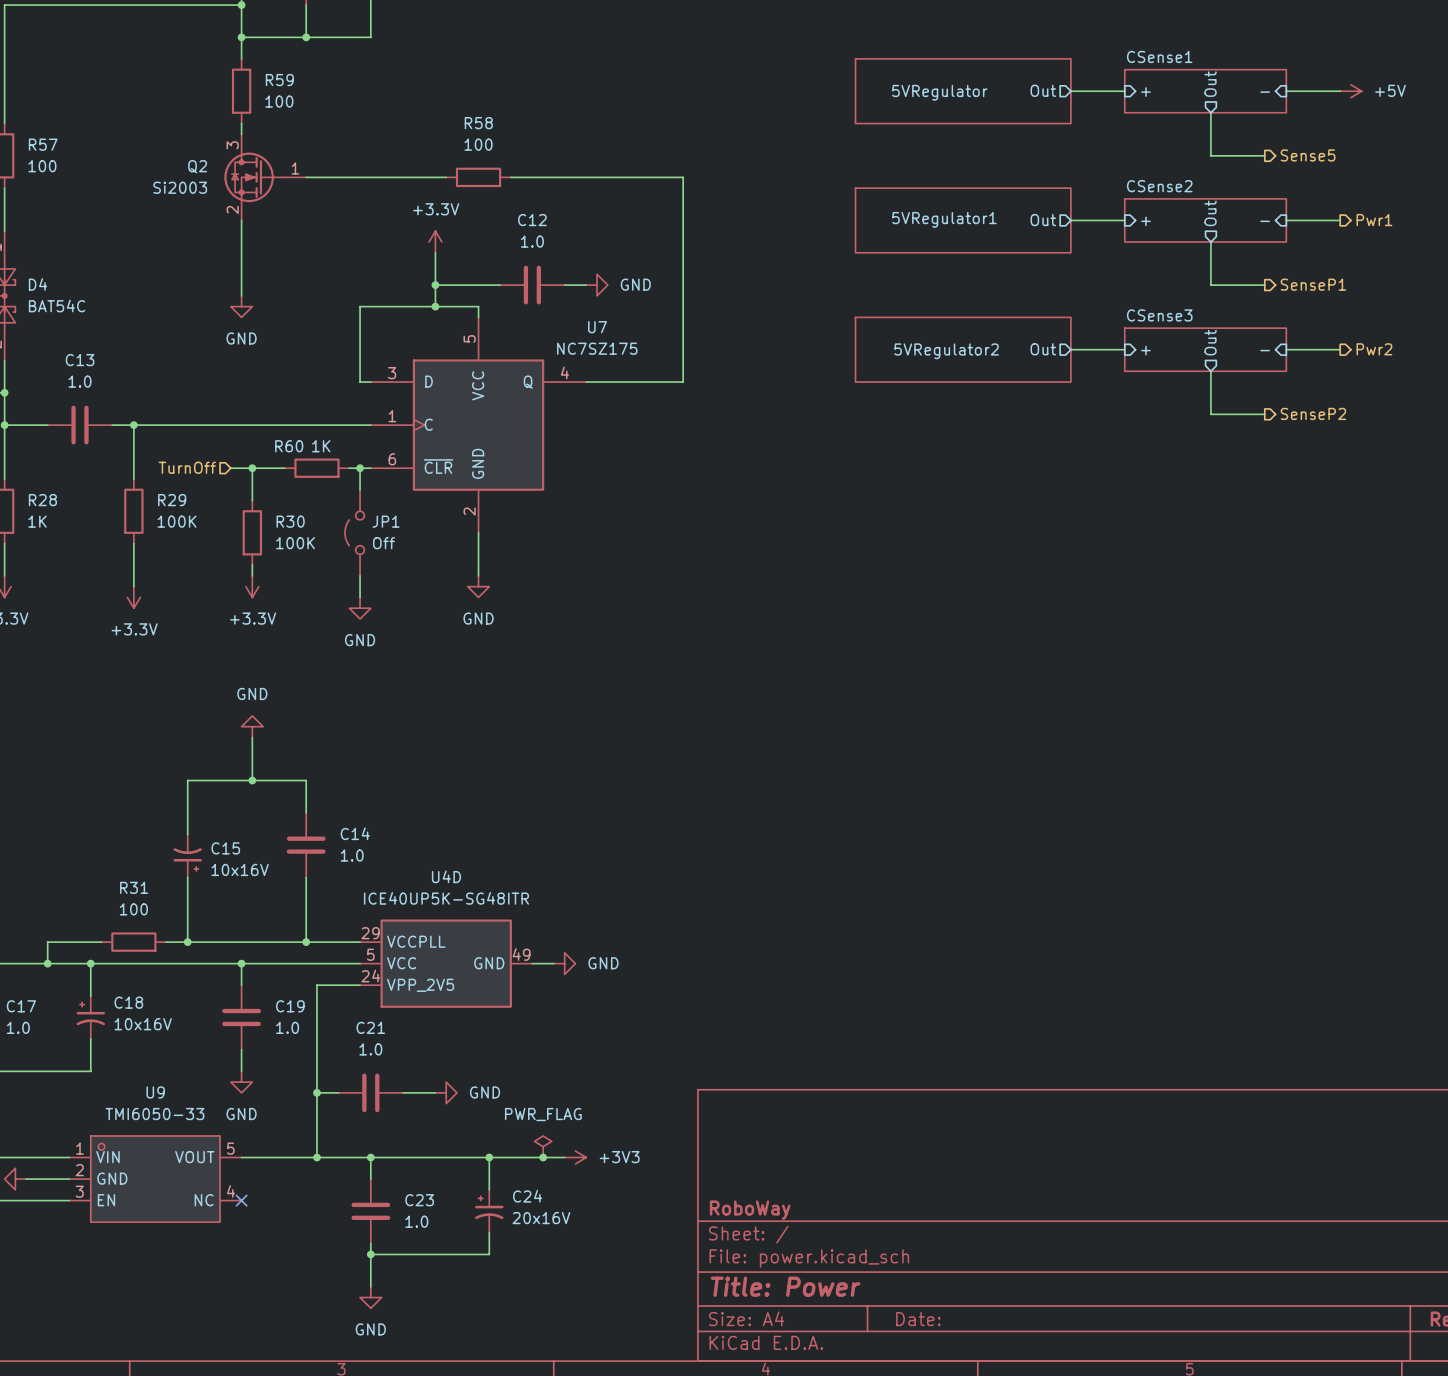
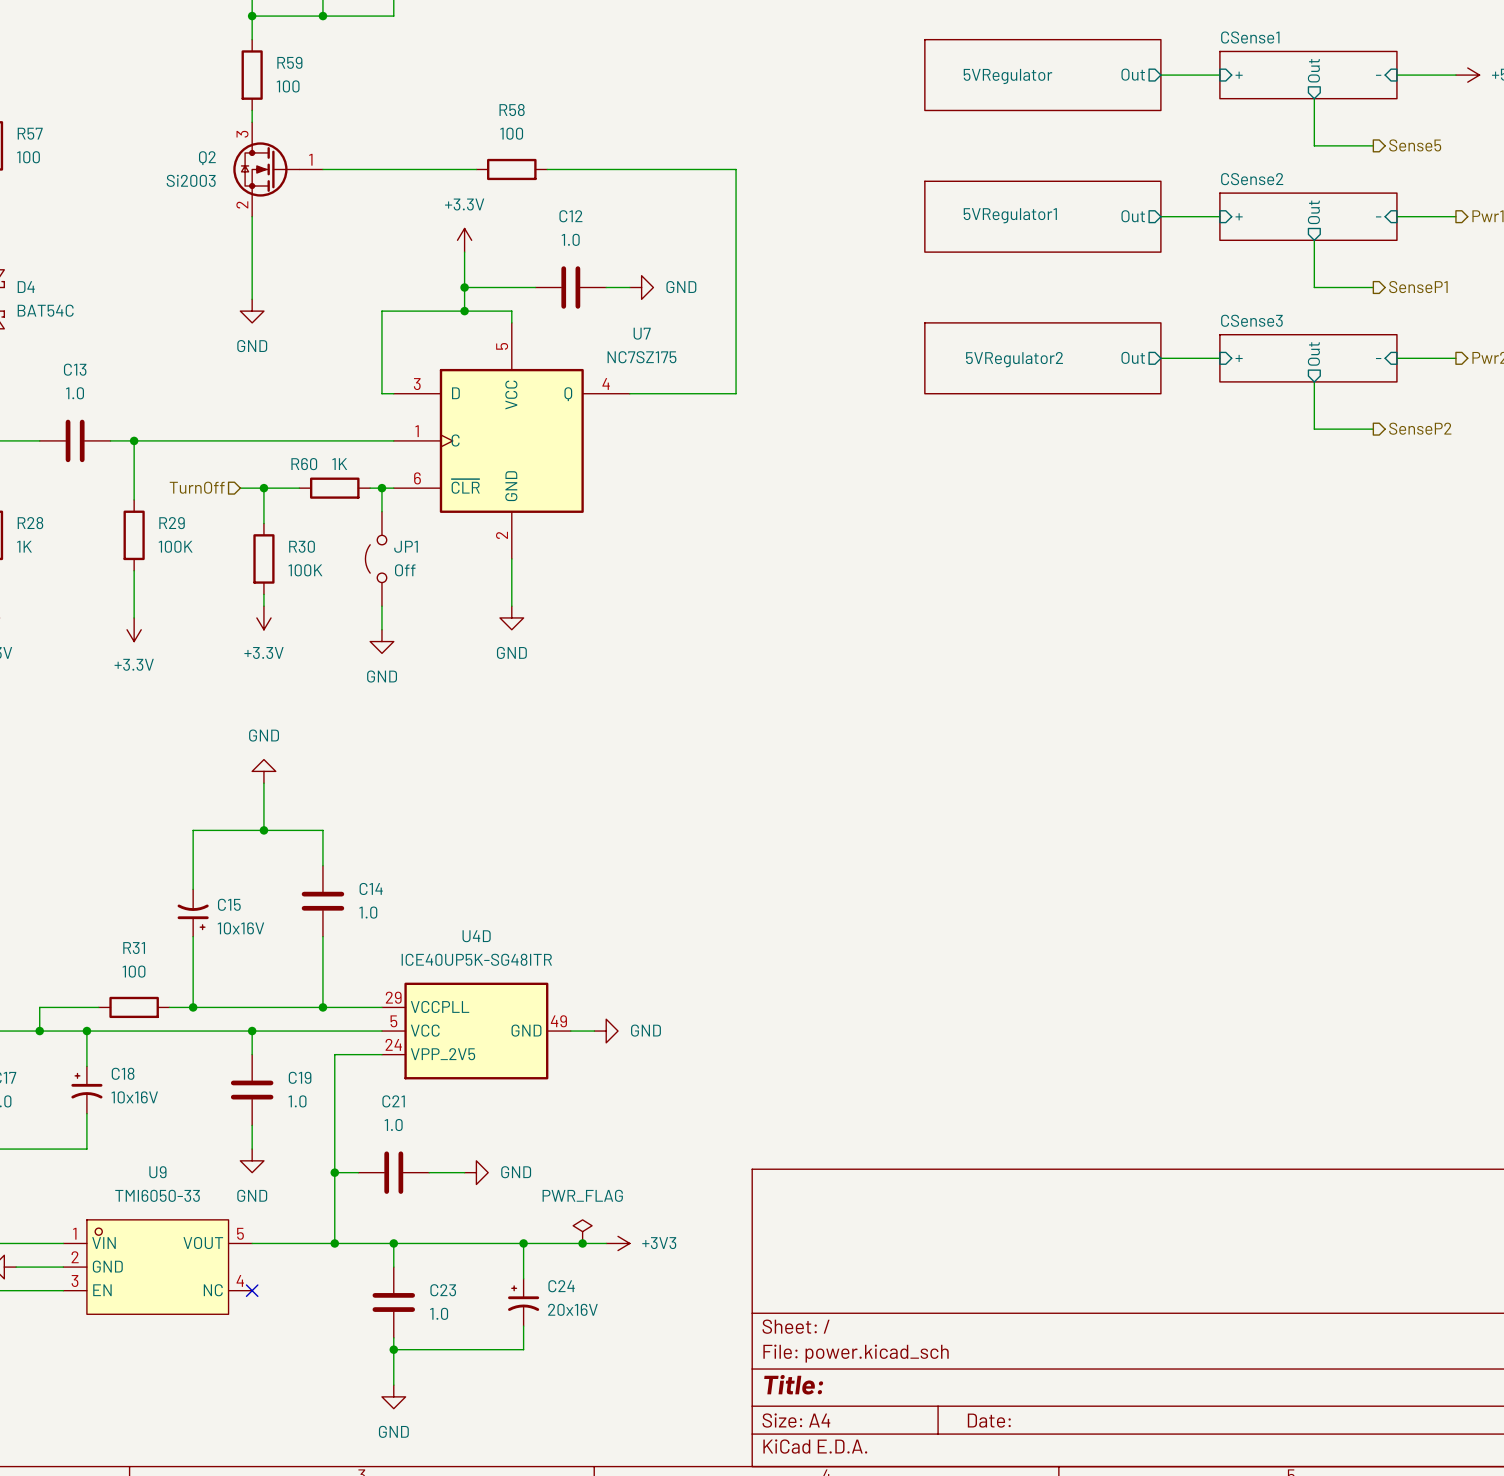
title block: RoboWay (750, 1210) -> none
title block: Title: Power (785, 1286) -> Title: (793, 1384)

